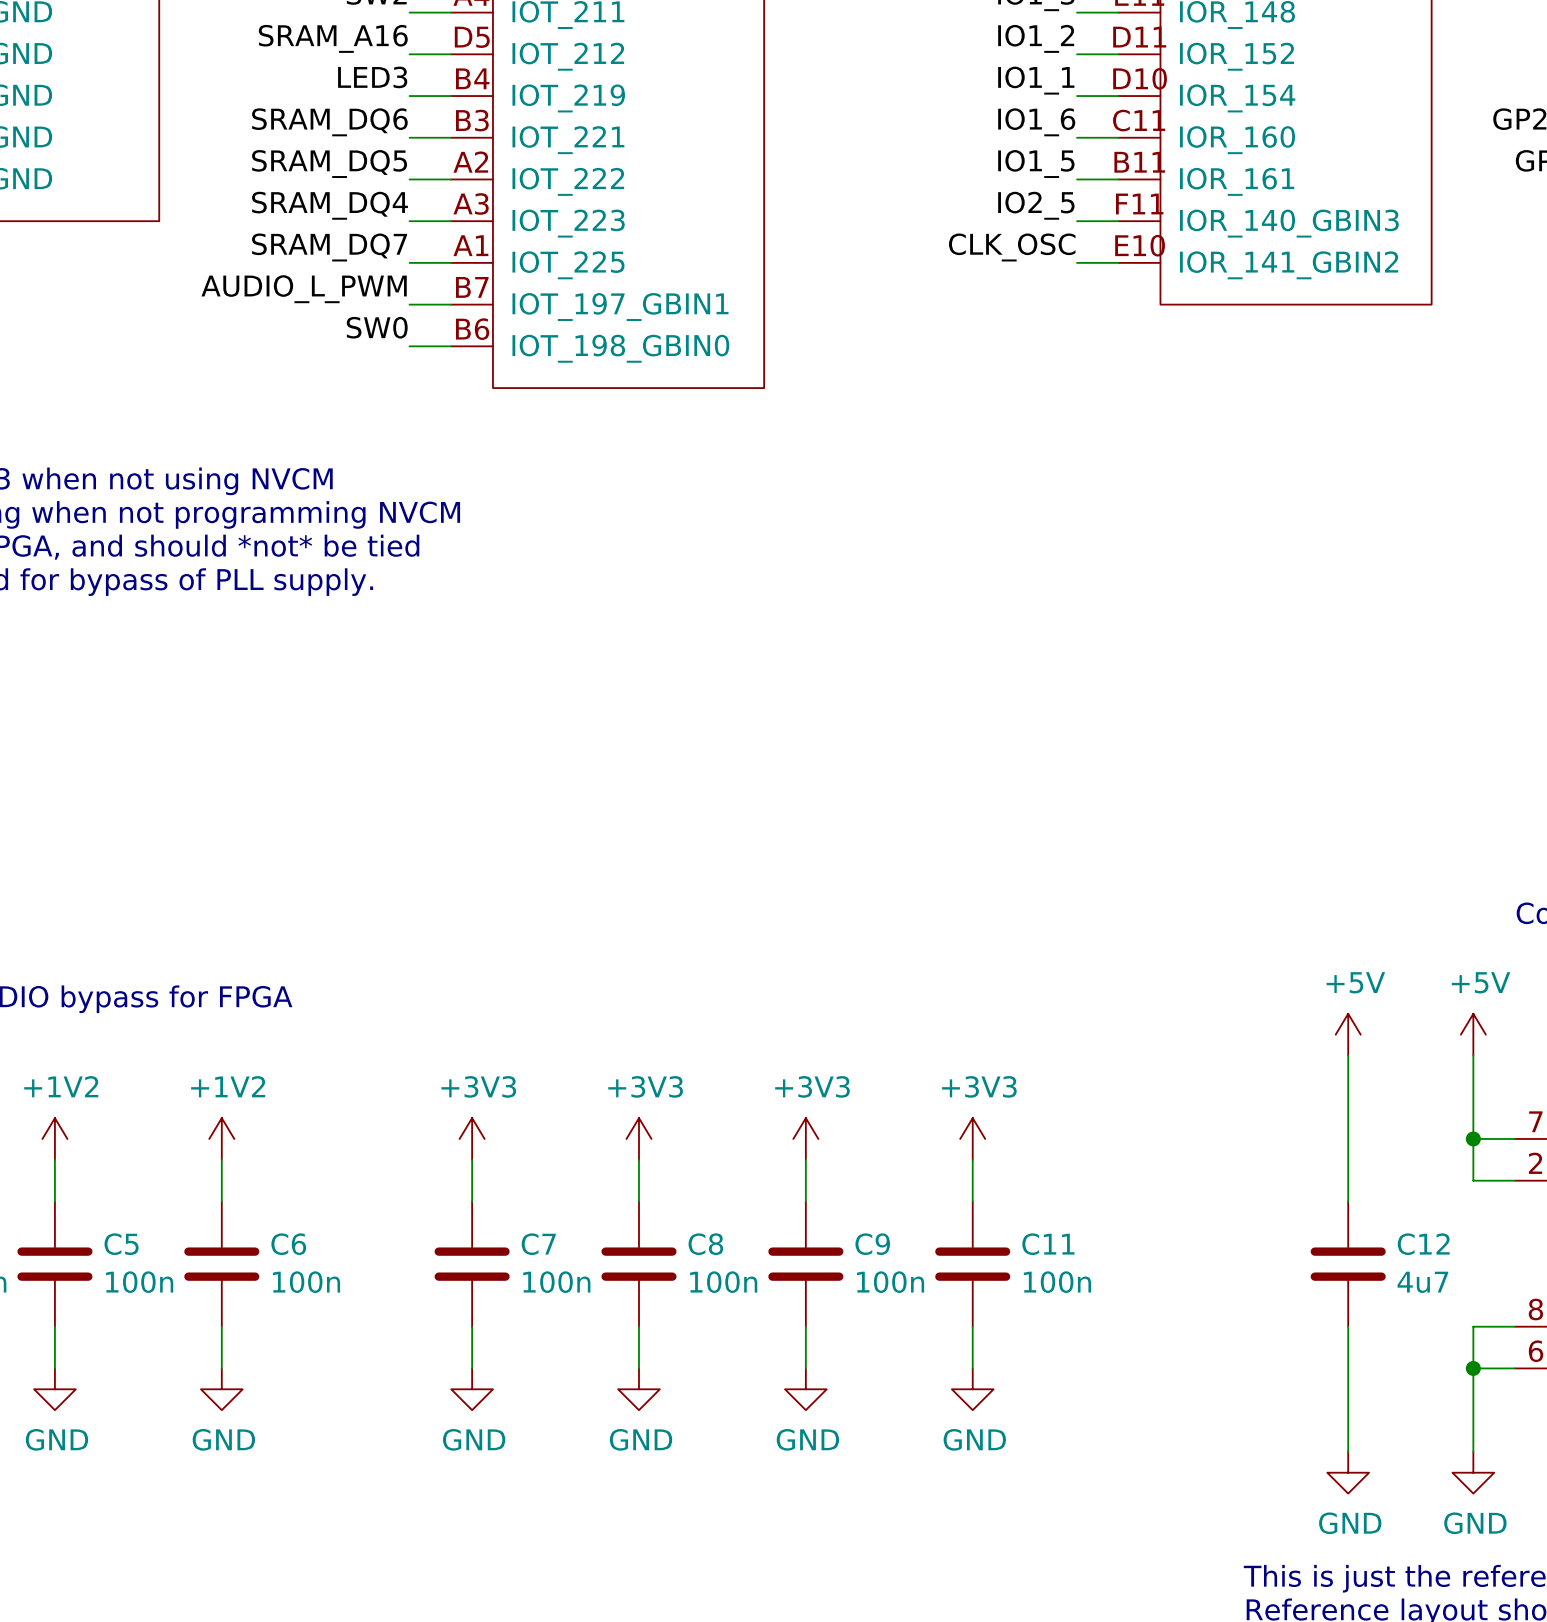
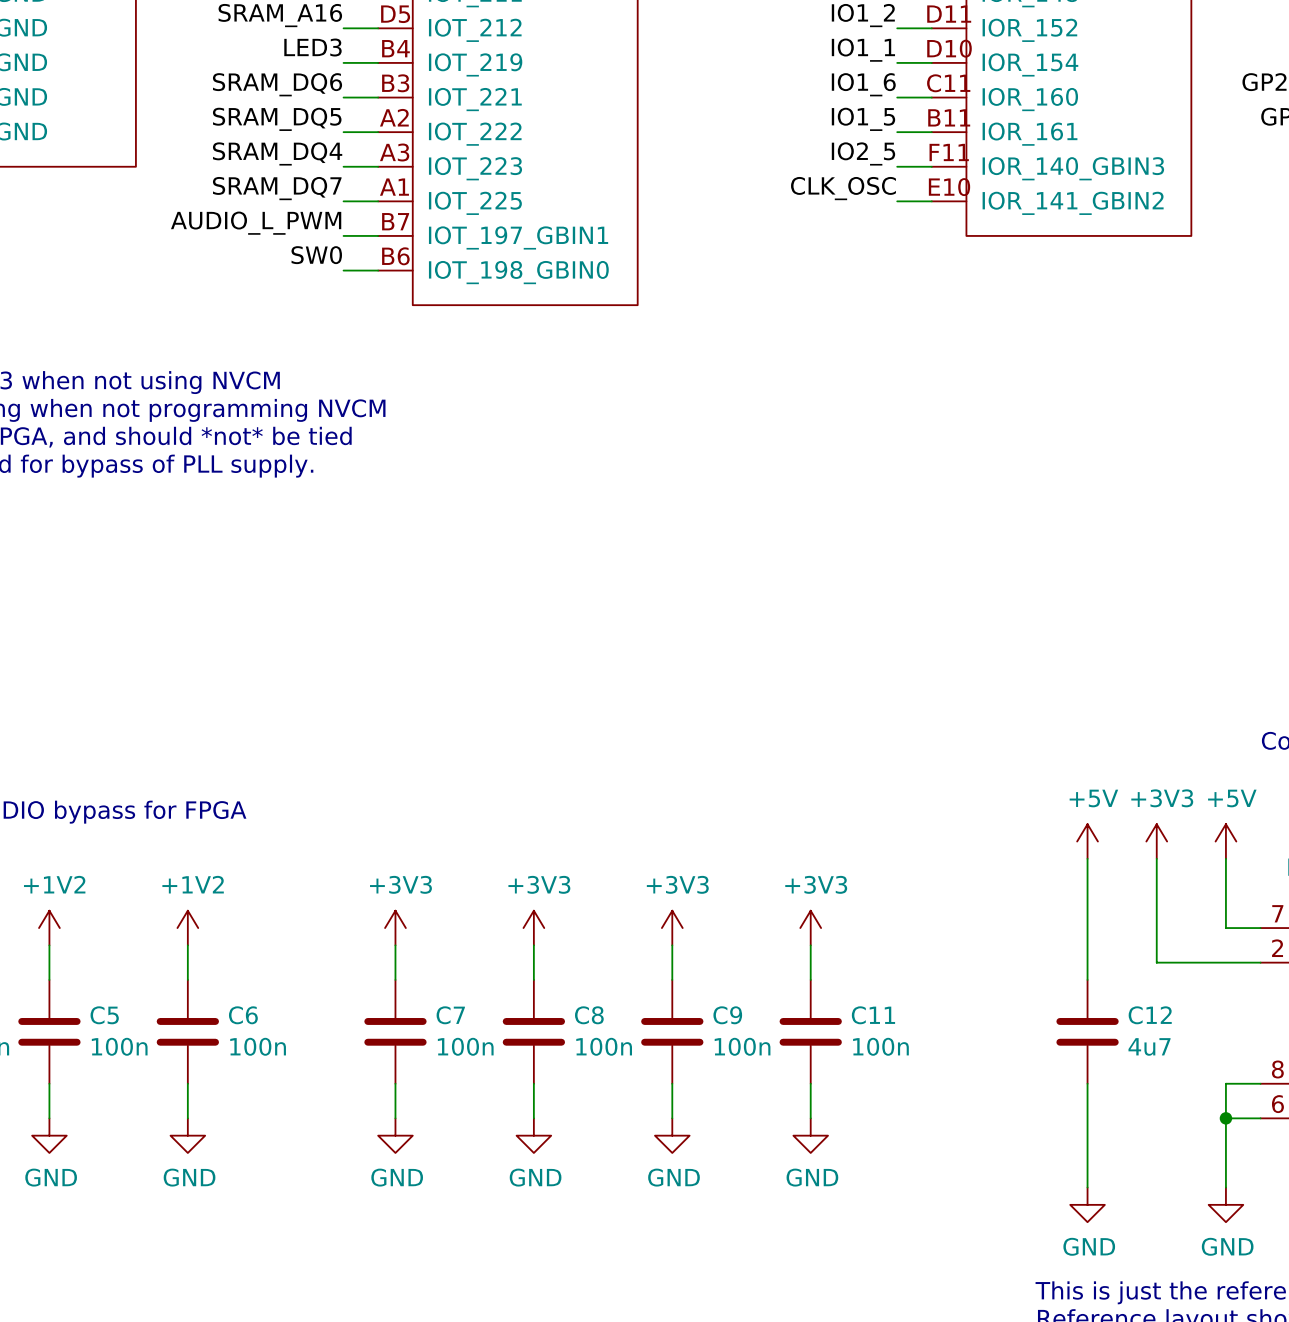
power symbol position: +5V (1348, 1034) -> +5V (1087, 841)
power symbol: none -> +3V3 (1156, 841)
wire: (1348, 1055) (1348, 1201) -> (1087, 858) (1087, 979)
wire: (1473, 1138) (1473, 1180) -> (1156, 858) (1156, 962) (1225, 962)
junction: (1473, 1138) -> none
C12 position: (1348, 1264) -> (1087, 1031)
wire: (1348, 1326) (1348, 1451) -> (1087, 1083) (1087, 1187)
power symbol position: GND (1348, 1472) -> GND (1087, 1204)

